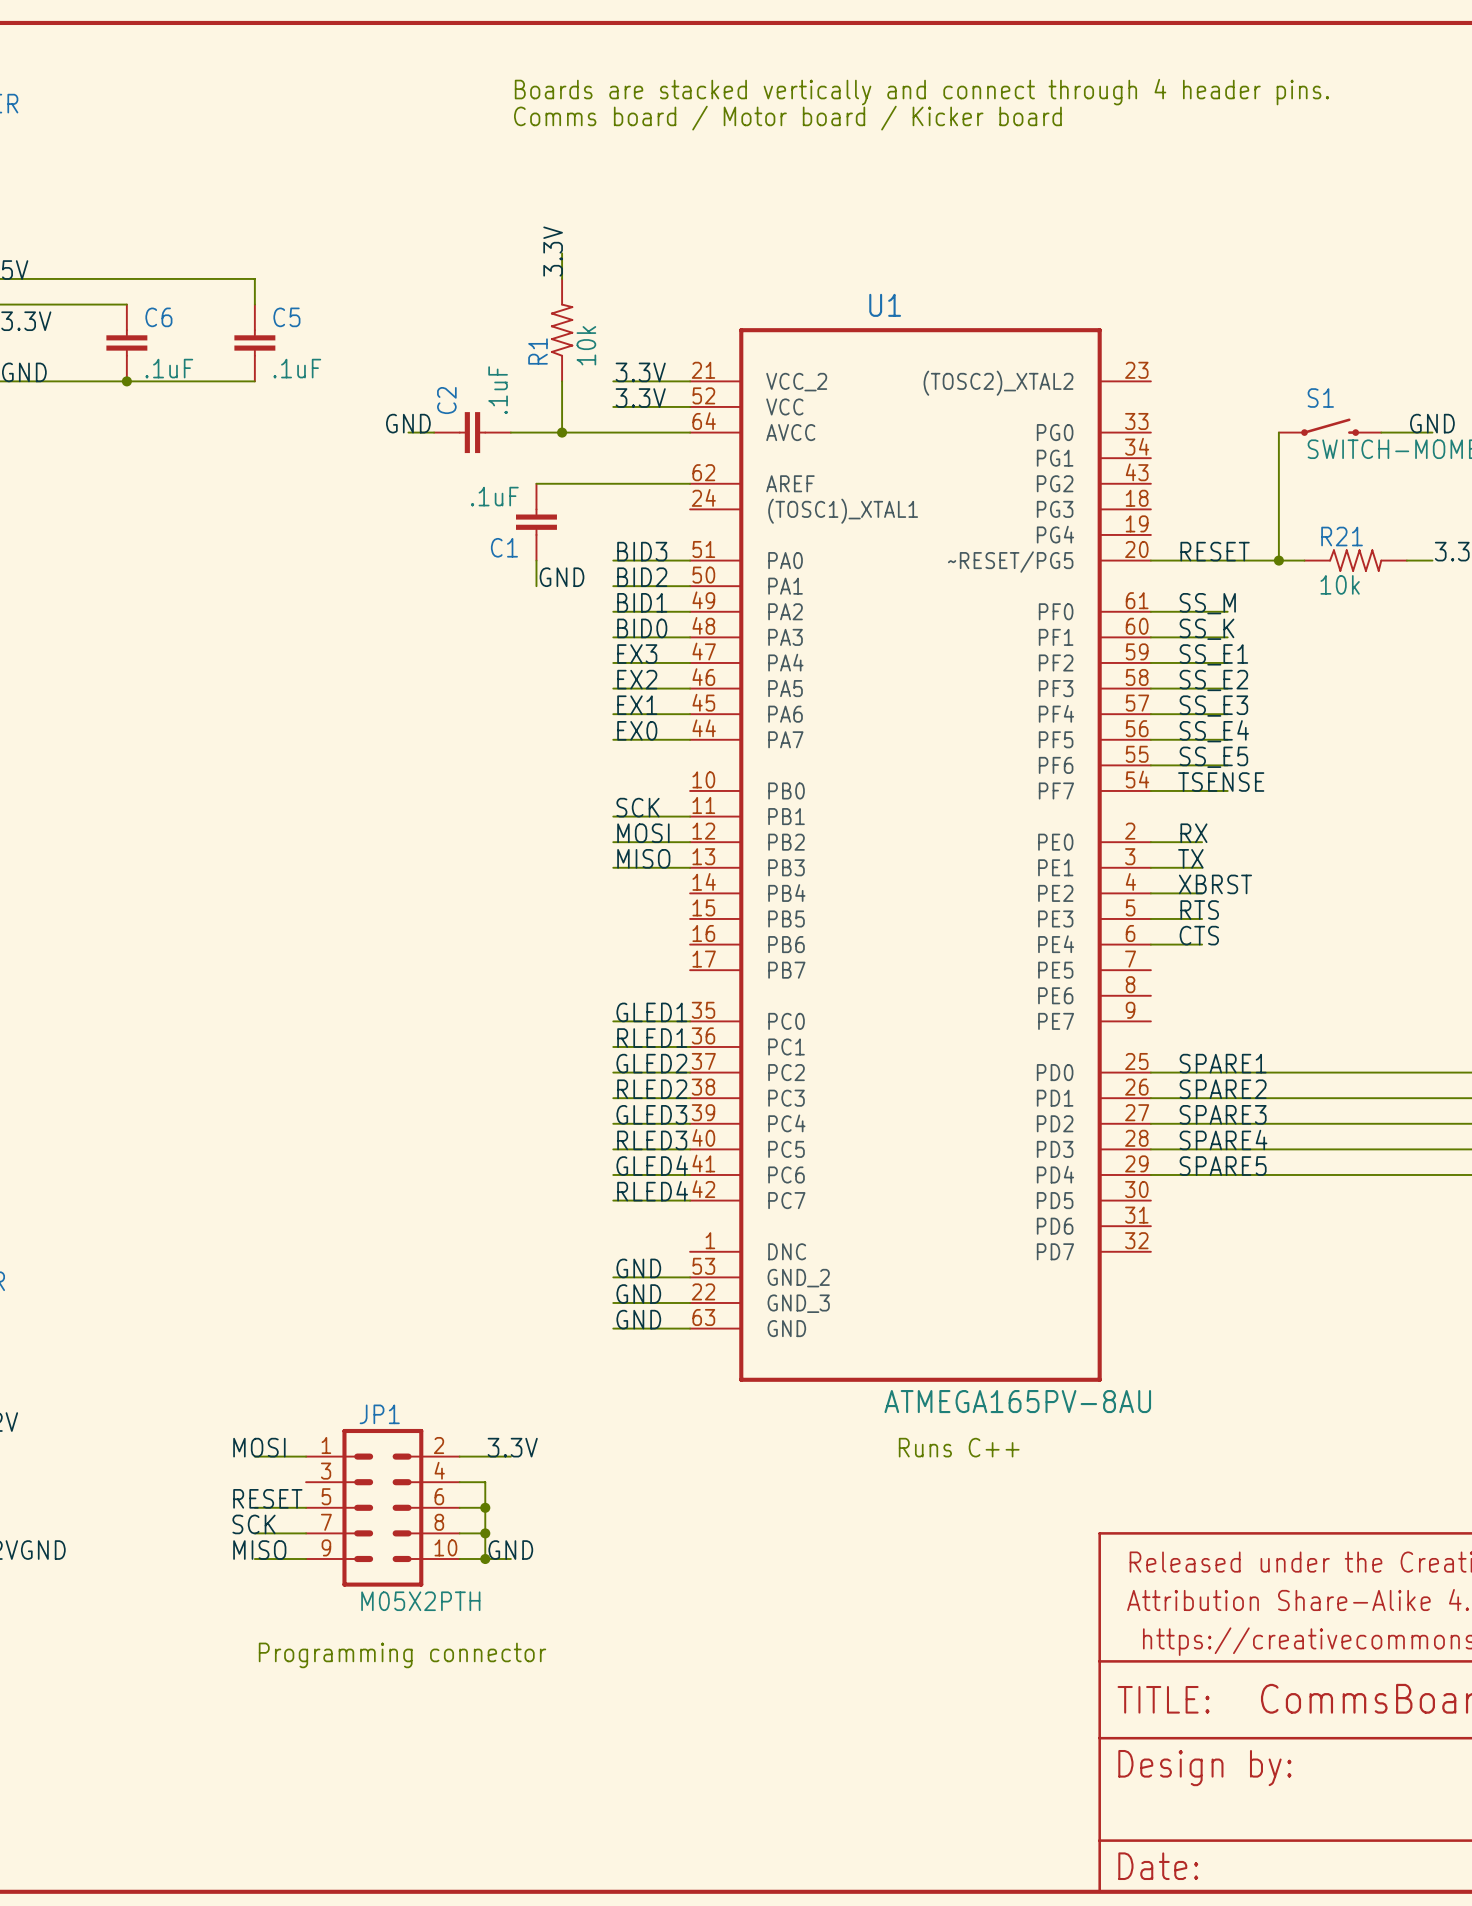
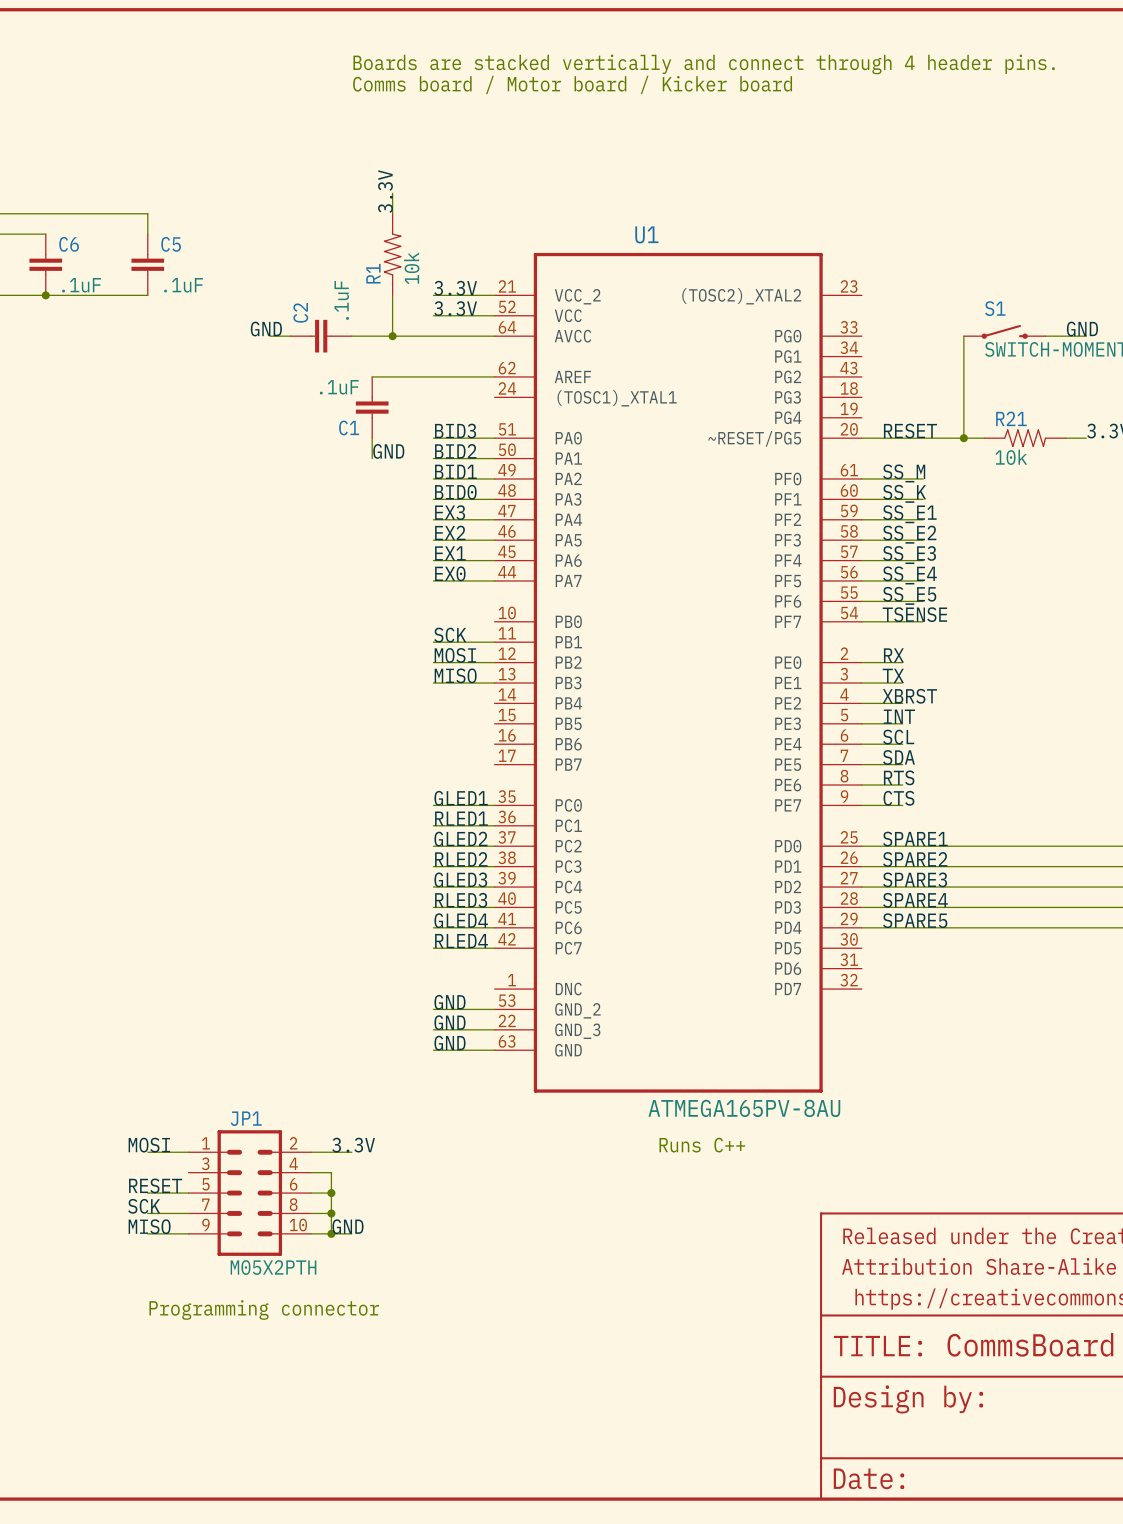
label: RTS (1199, 910) -> INT (899, 716)
label: CTS (1199, 935) -> SCL (898, 737)
label: none -> SDA (898, 757)
wire: none -> (861, 764) (902, 764)
label: none -> RTS (899, 777)
wire: none -> (861, 785) (902, 785)
label: none -> CTS (898, 798)
wire: none -> (861, 805) (902, 805)

